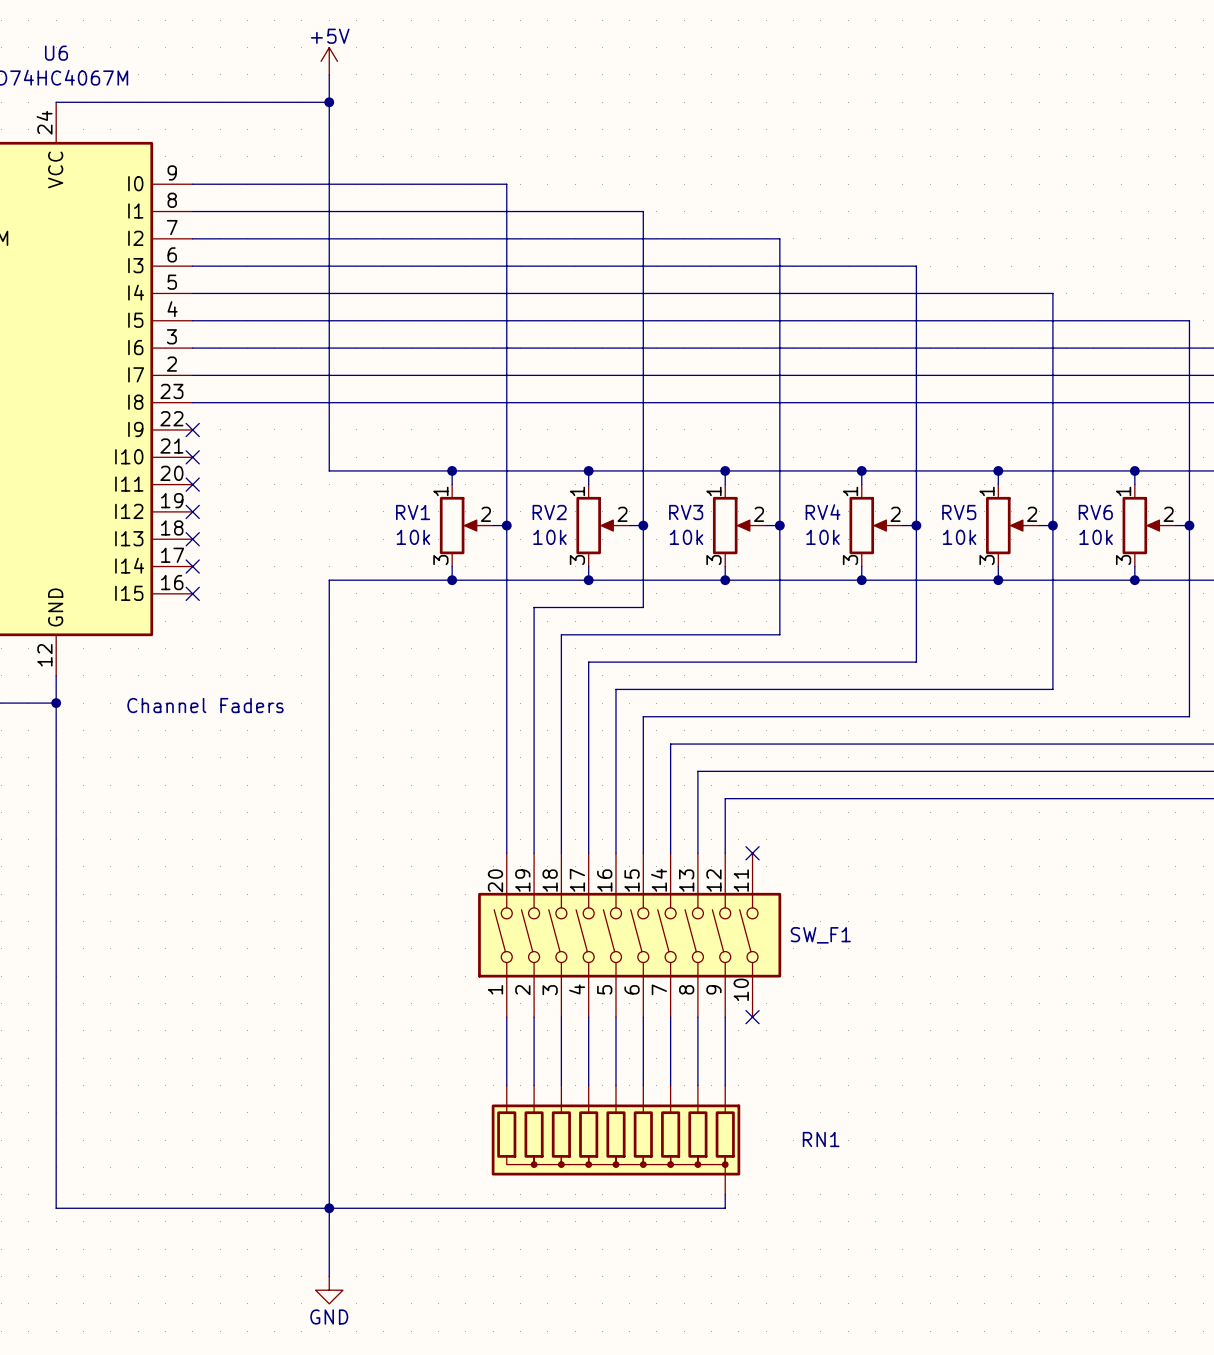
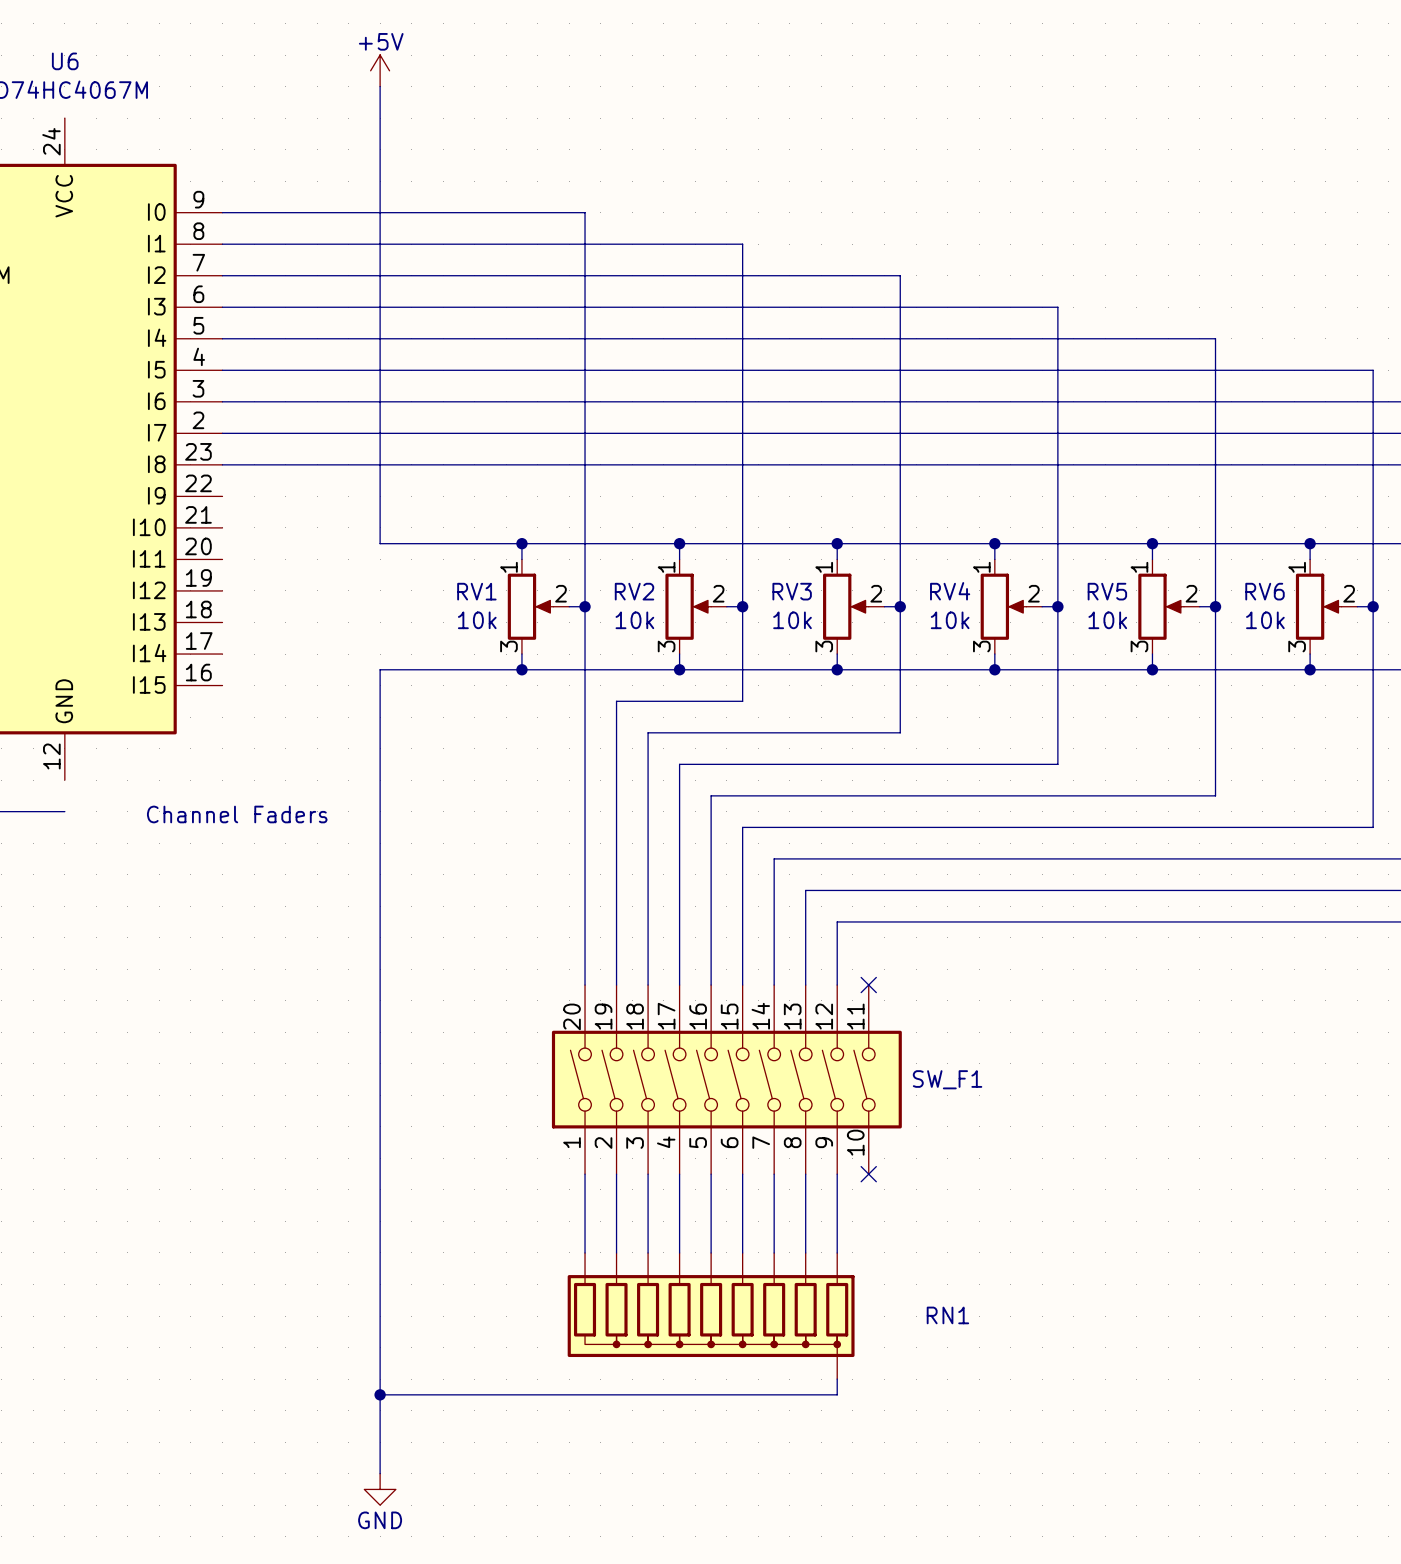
wire: (56, 102) (329, 102) -> none
junction: (329, 102) -> none
no-connect mark: (192, 429) -> none
no-connect mark: (192, 457) -> none
no-connect mark: (192, 484) -> none
no-connect mark: (192, 511) -> none
no-connect mark: (192, 539) -> none
no-connect mark: (192, 566) -> none
no-connect mark: (192, 593) -> none
wire: (56, 675) (56, 1208) (329, 1208) -> none
junction: (56, 703) -> none

